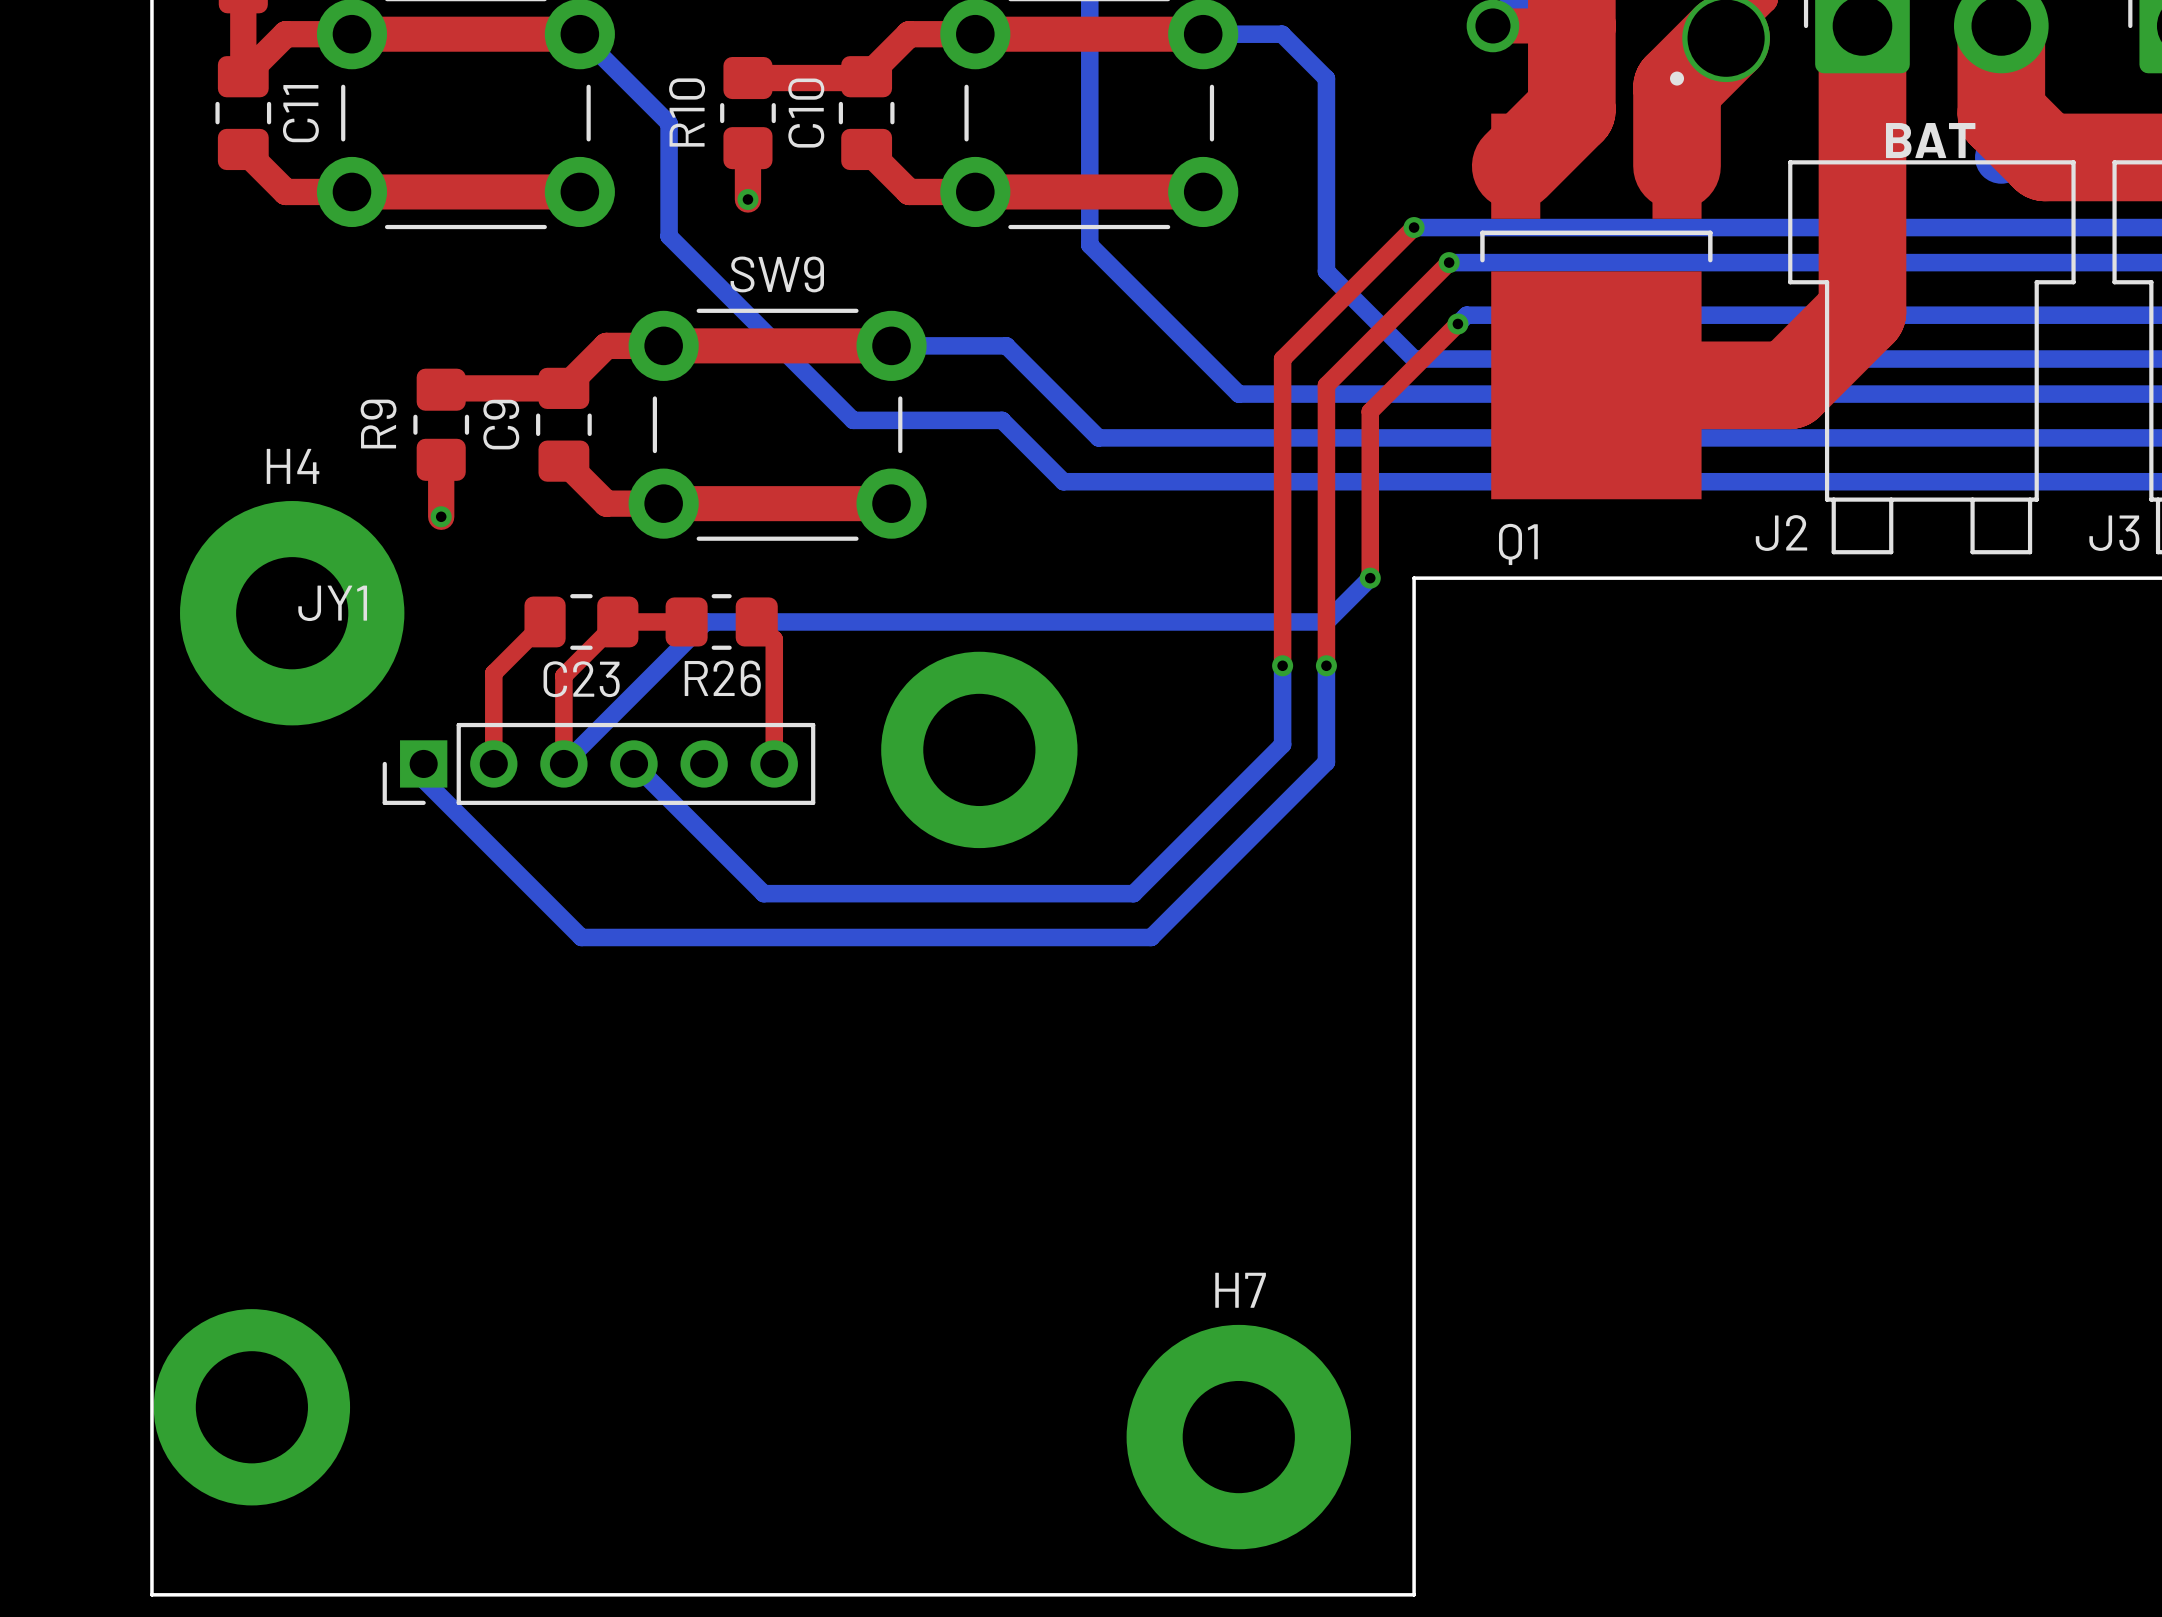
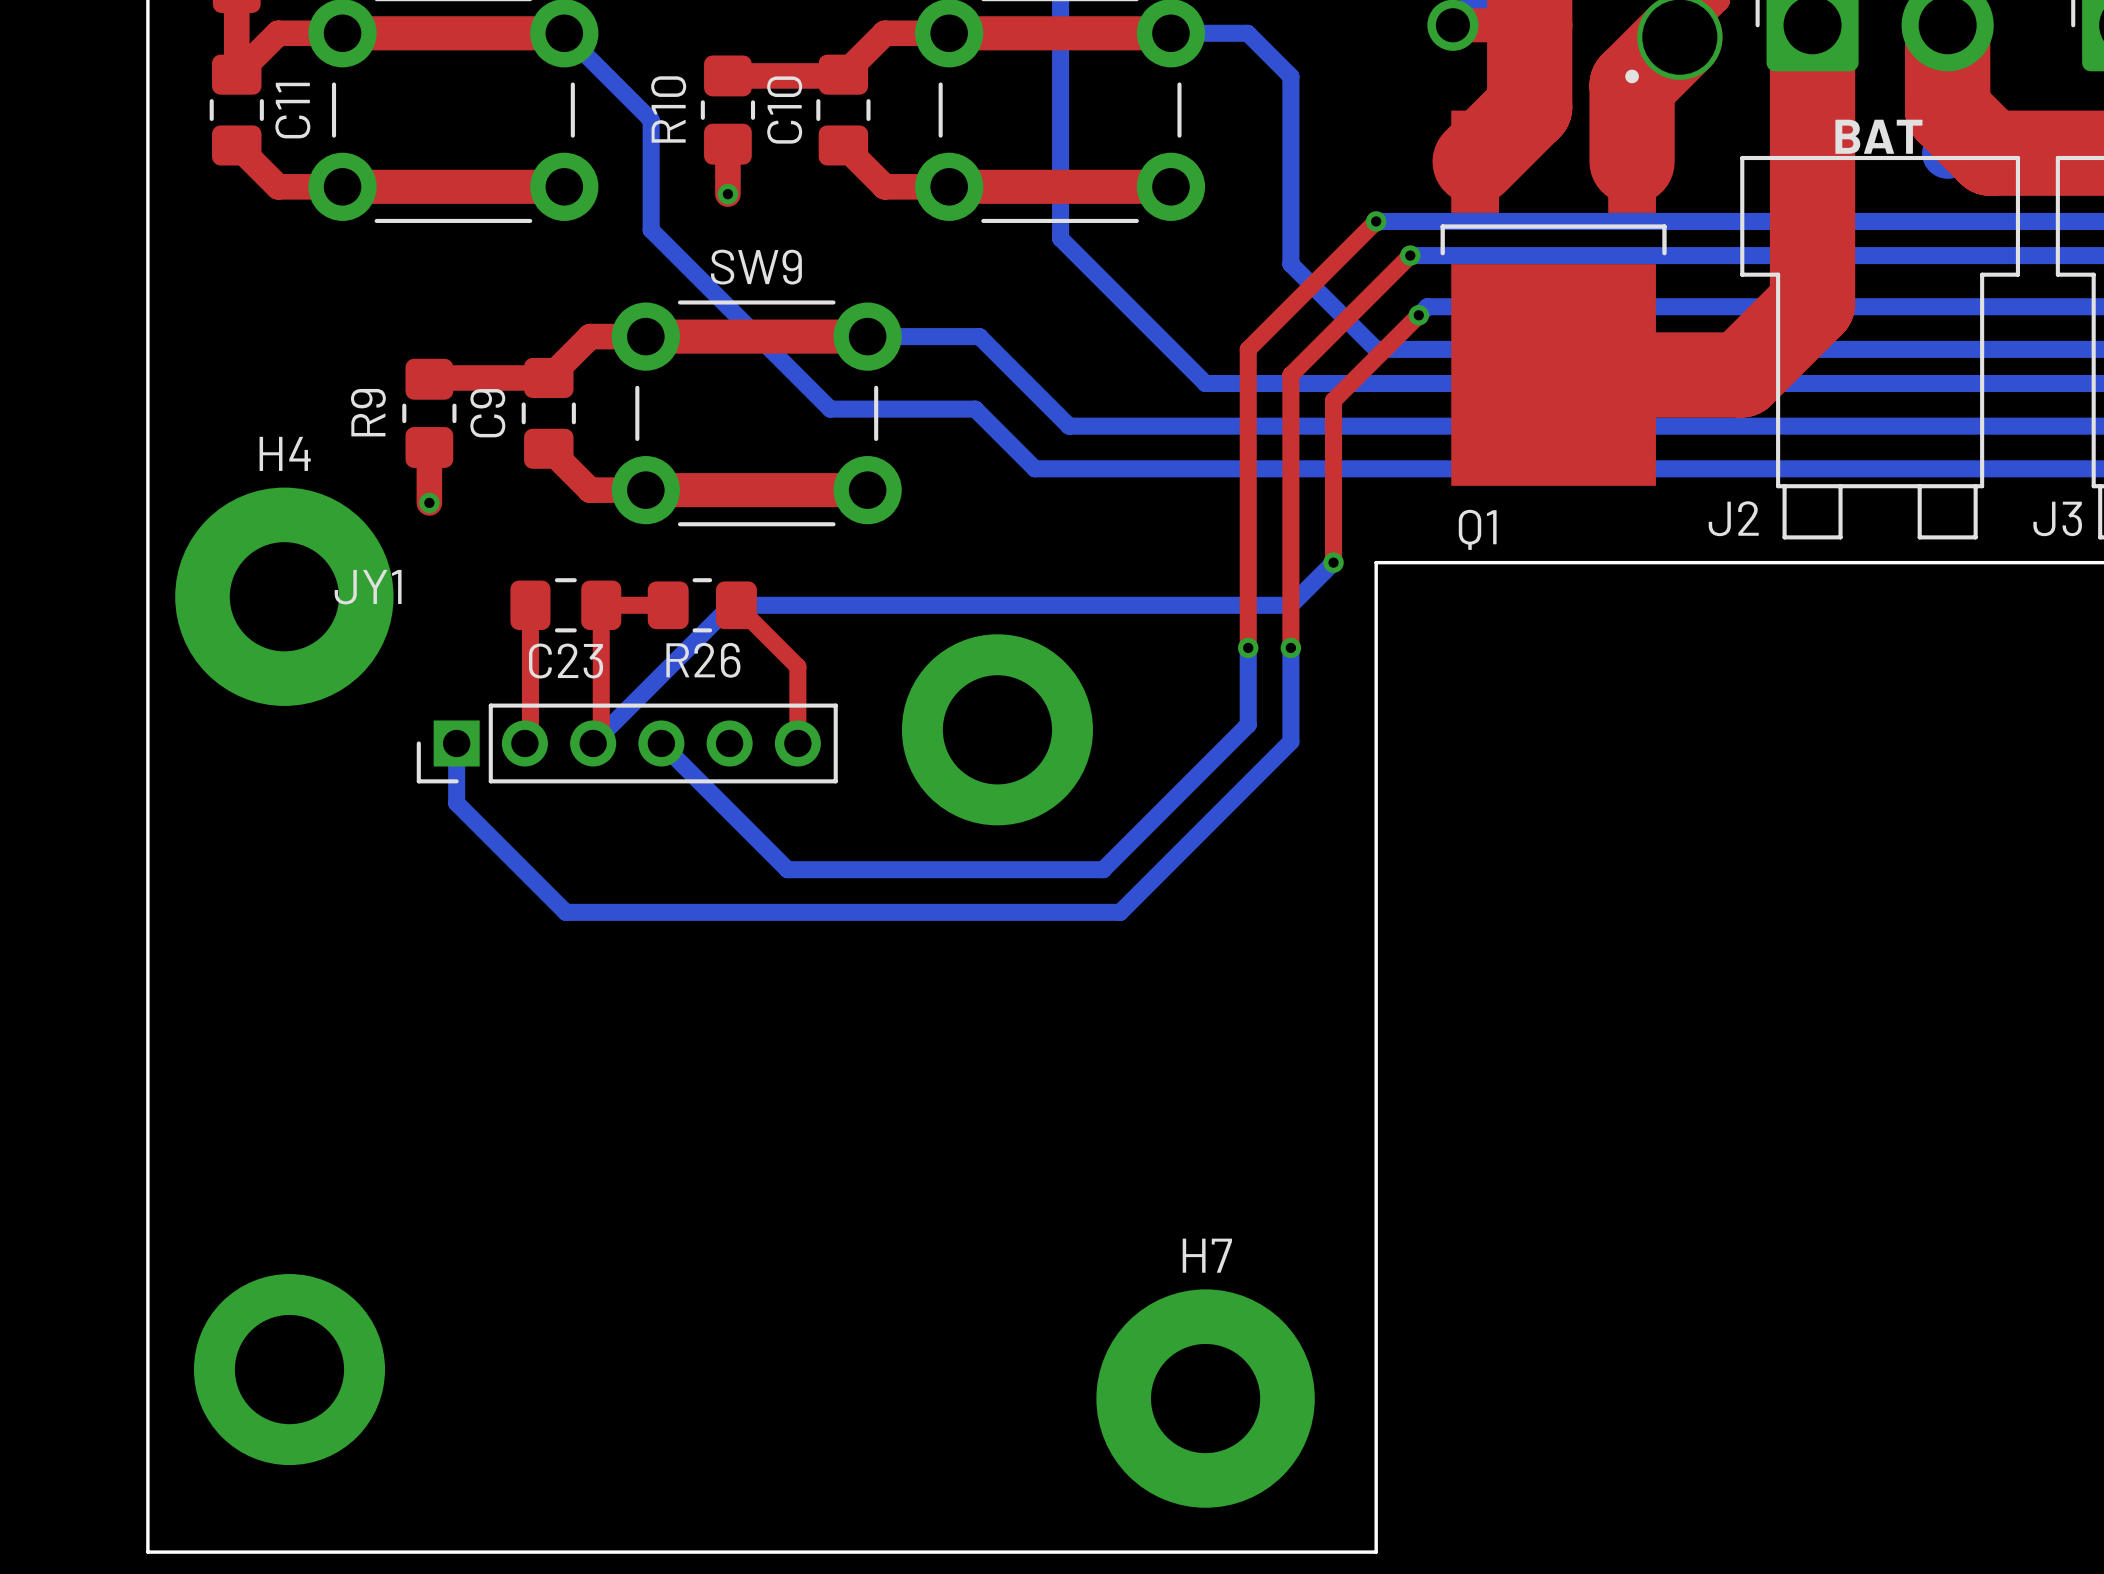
top track: (545, 621) (493, 673) (493, 763) -> (530, 605) (530, 737) (524, 743)
top track: (617, 621) (563, 675) (563, 763) -> (601, 605) (601, 735) (593, 743)
bottom track: (751, 621) (705, 621) (563, 763) -> (731, 605) (593, 743)
top track: (774, 639) (774, 763) -> (753, 622) (797, 666) (797, 743)
bottom track: (423, 763) (423, 779) (469, 825) -> (456, 743) (456, 803)
bottom track: (634, 763) (763, 893) (809, 893) -> (661, 743) (787, 869)
JY1 position: (615, 1078) -> (643, 1049)

